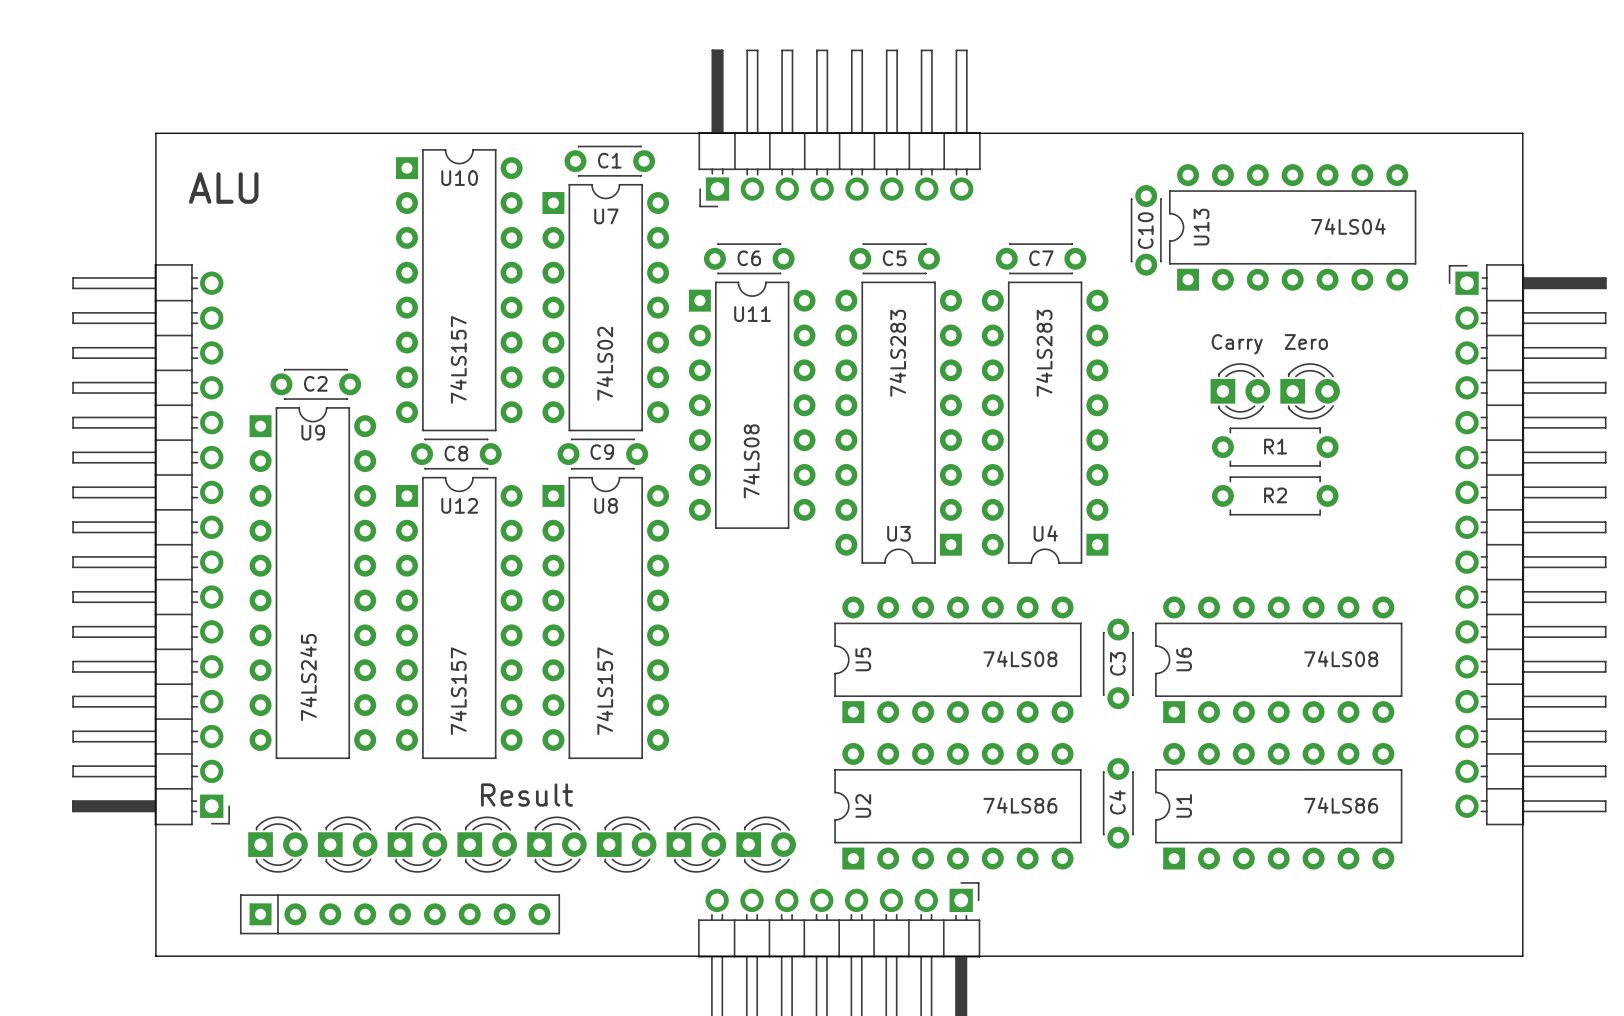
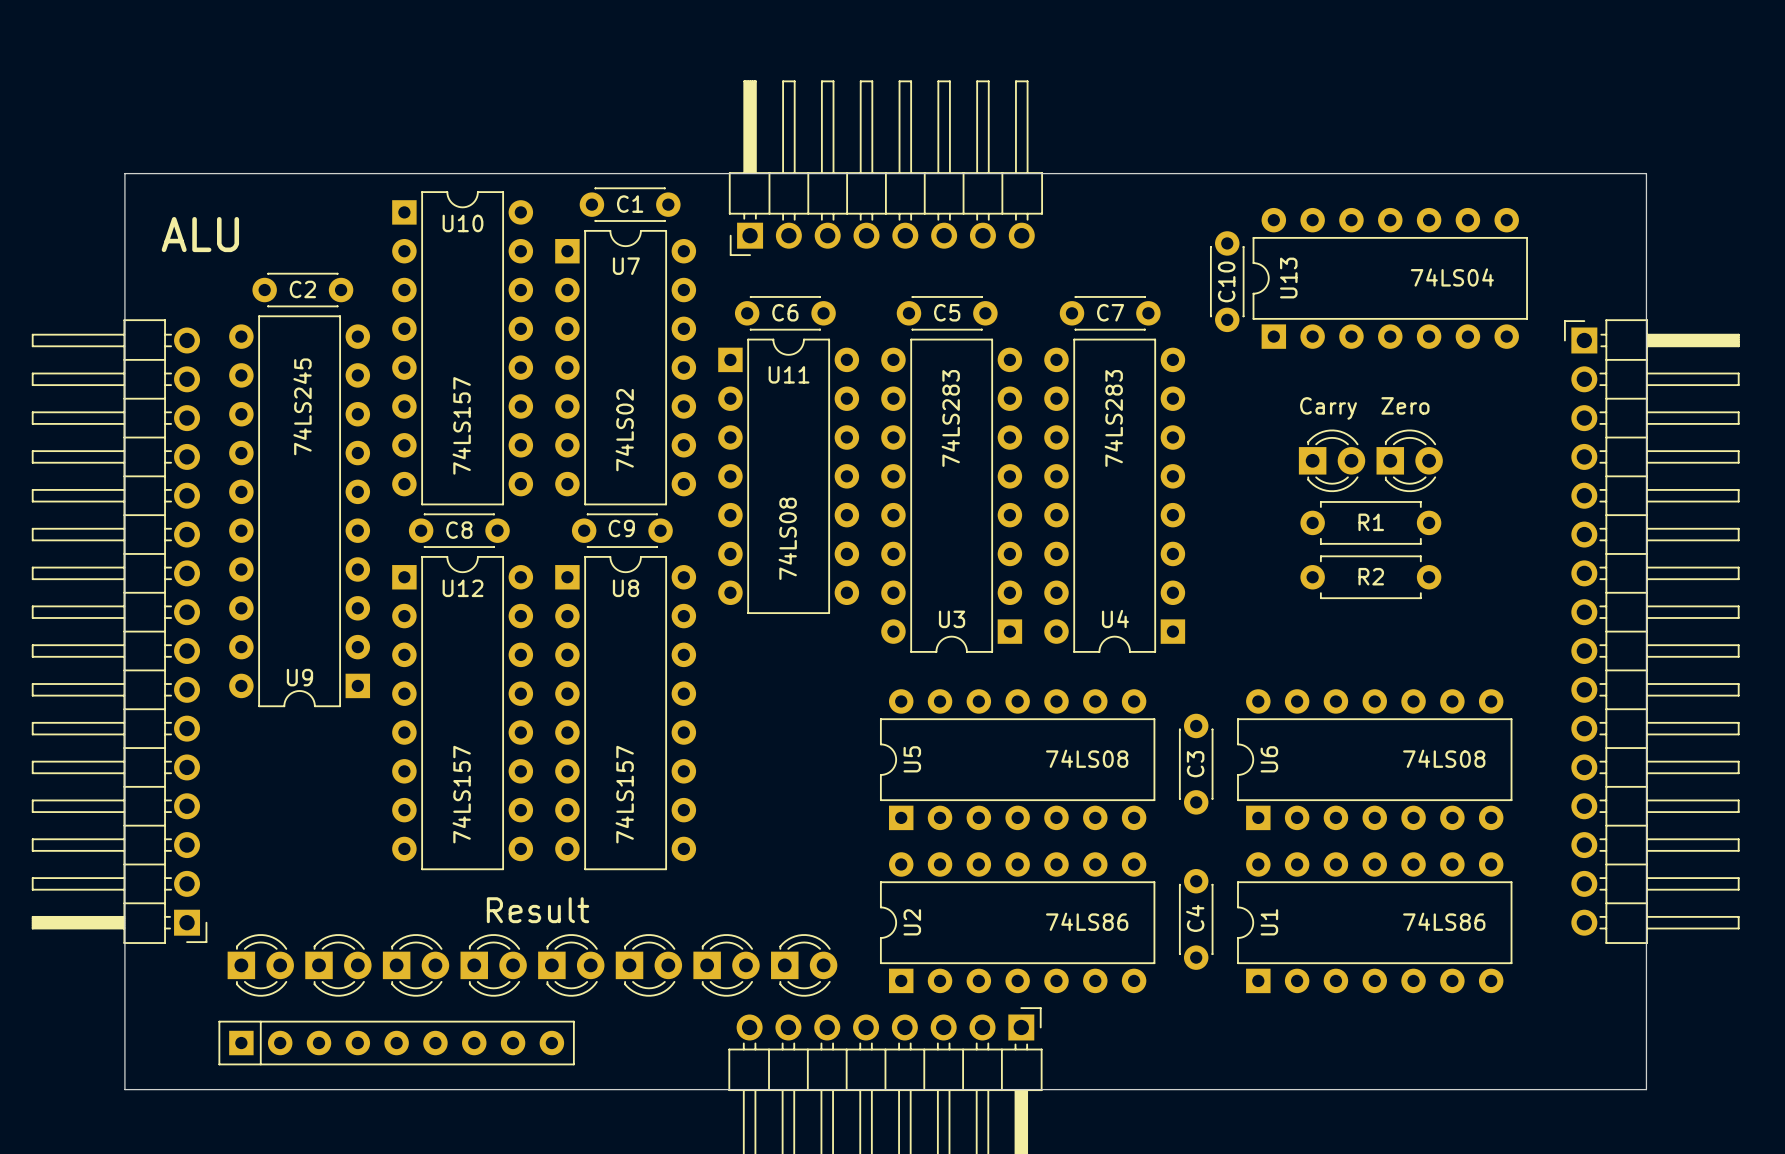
C2 position: (315, 384) -> (302, 290)
U9 rotation: 0° (312, 583) -> 180° (299, 511)

